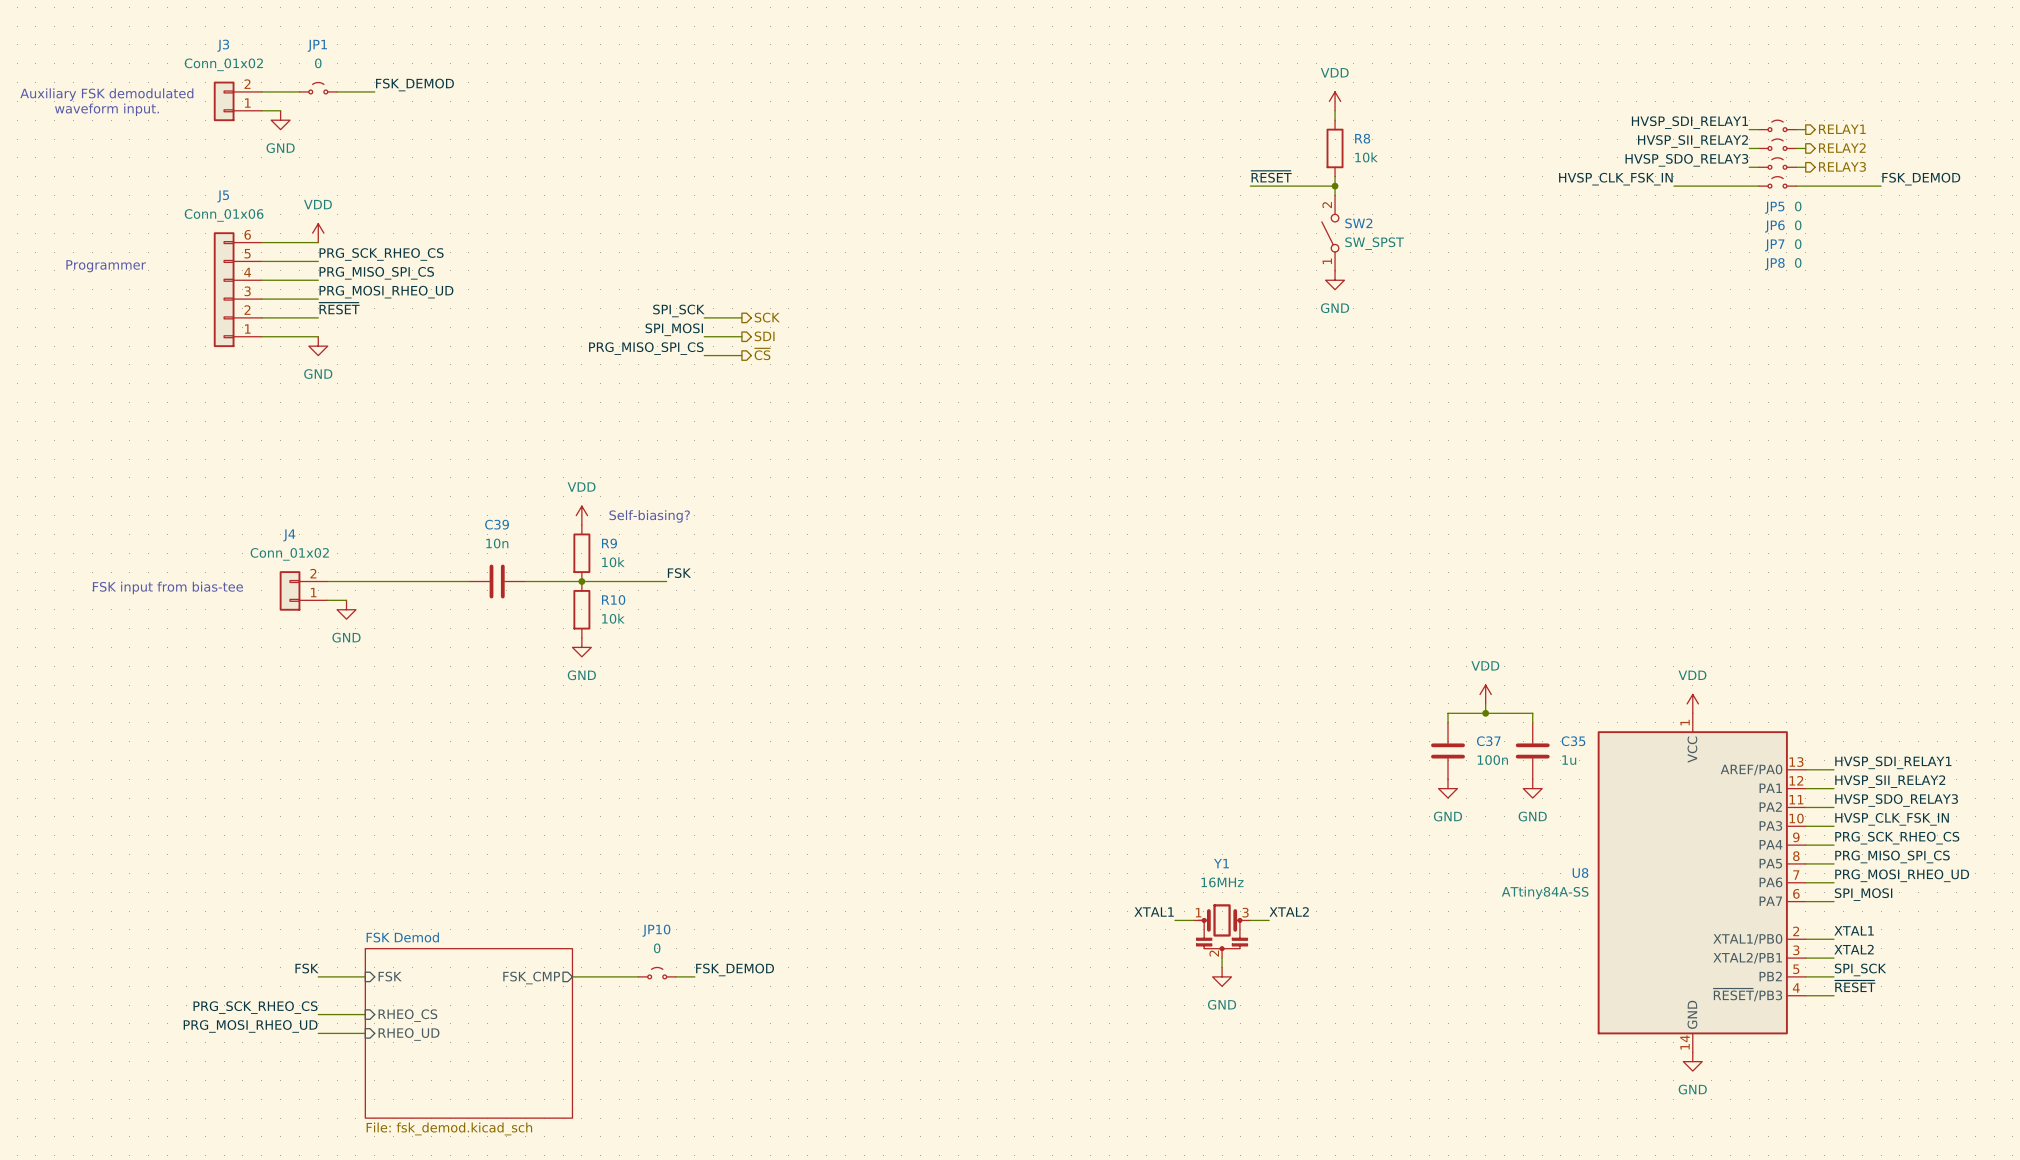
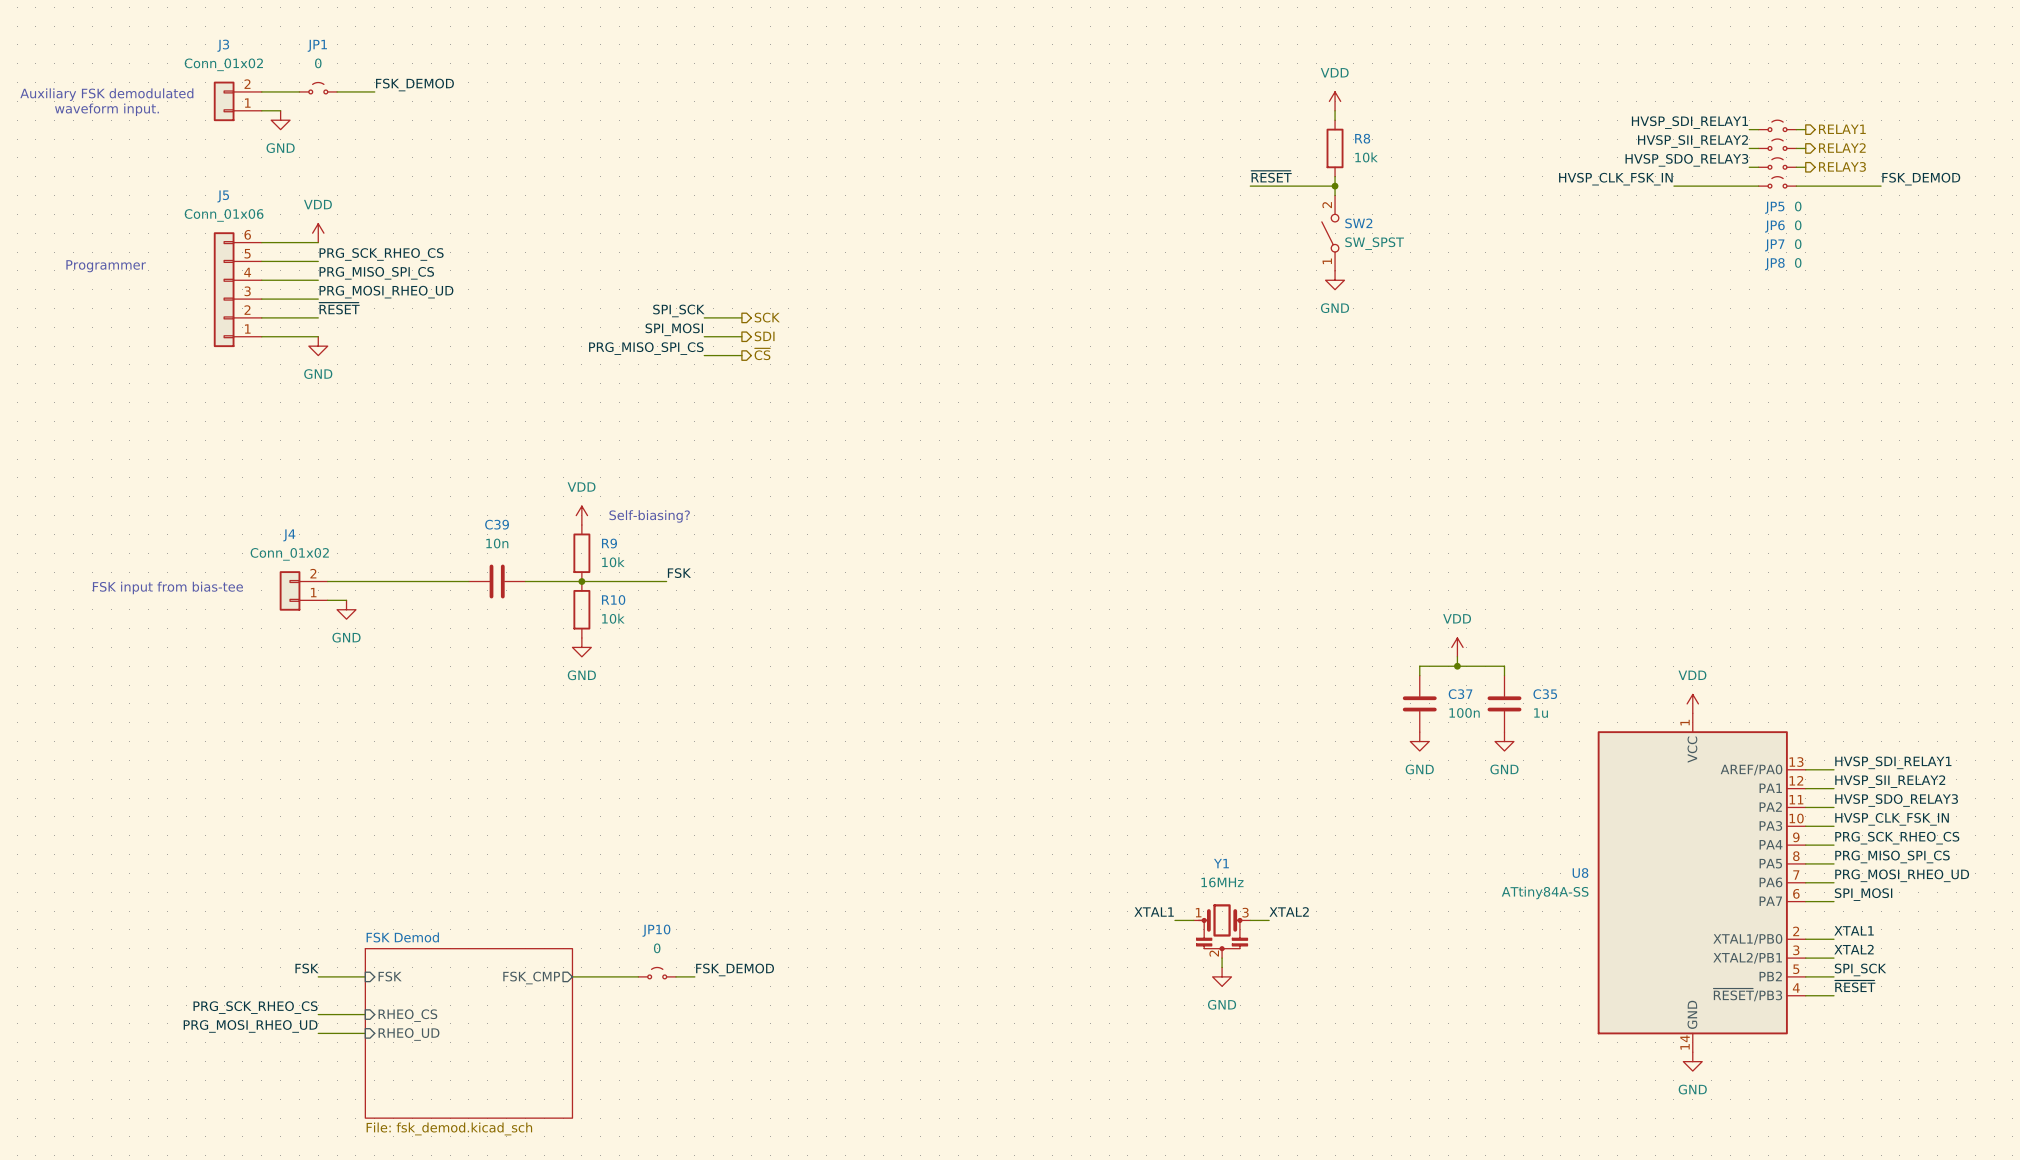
junction: none -> (1457, 666)
power symbol position: VDD (1485, 694) -> VDD (1457, 647)
wire: (1485, 703) (1485, 713) -> (1457, 656) (1457, 666)
junction: (1485, 713) -> none
wire: (1448, 722) (1448, 713) (1532, 713) (1532, 722) -> (1419, 675) (1419, 666) (1504, 666) (1504, 675)
power symbol: none -> GND (1419, 741)
power symbol: none -> GND (1504, 741)
C37 position: (1448, 750) -> (1419, 703)
C35 position: (1532, 750) -> (1504, 703)
power symbol: GND (1448, 788) -> none
power symbol: GND (1532, 788) -> none

